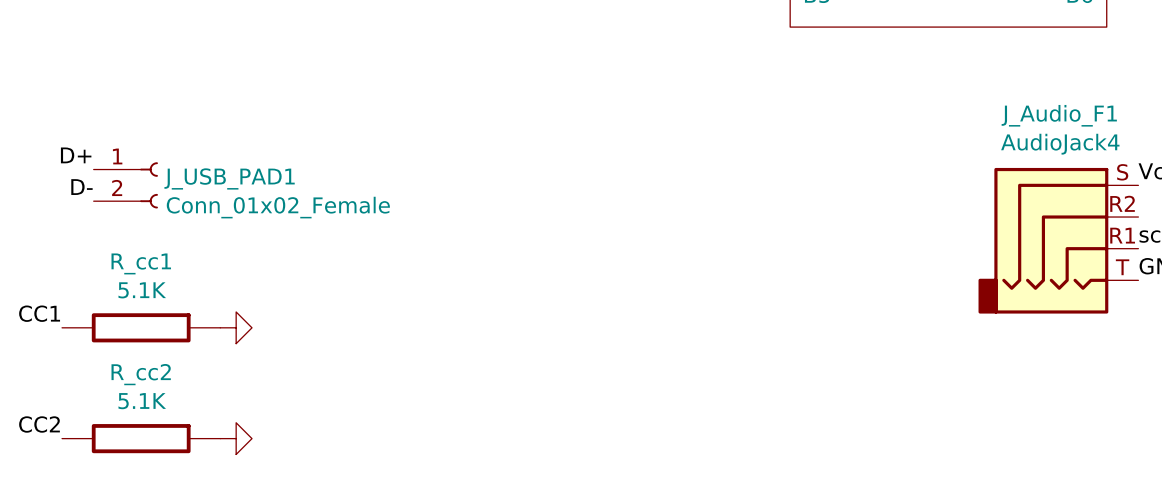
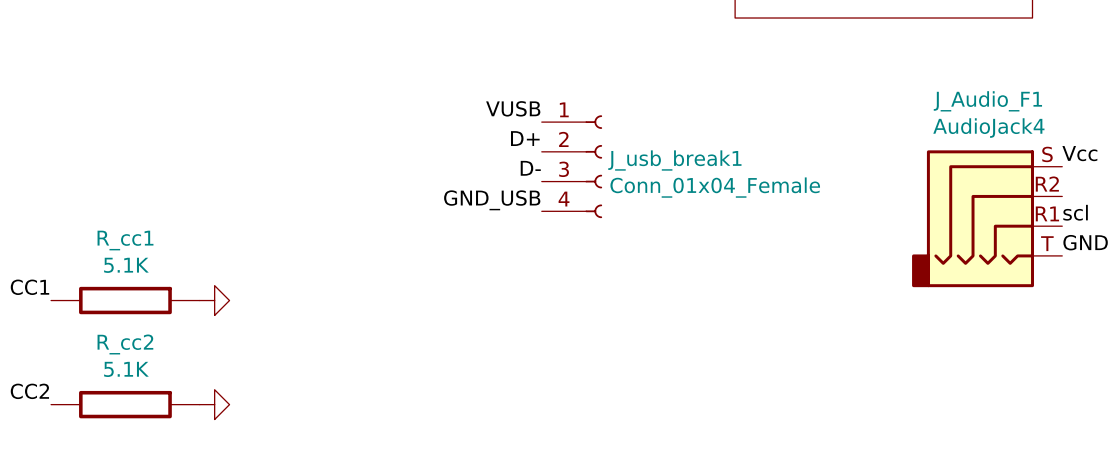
label: none -> VUSB (513, 108)
label: D+ (76, 155) -> none
label: none -> D+ (525, 138)
J_USB_PAD1: Conn_01x02_Female (125, 185) -> none
J_usb_break1: none -> Conn_01x04_Female (571, 166)
label: D- (81, 187) -> none
label: none -> D- (530, 168)
label: none -> GND_USB (492, 200)

